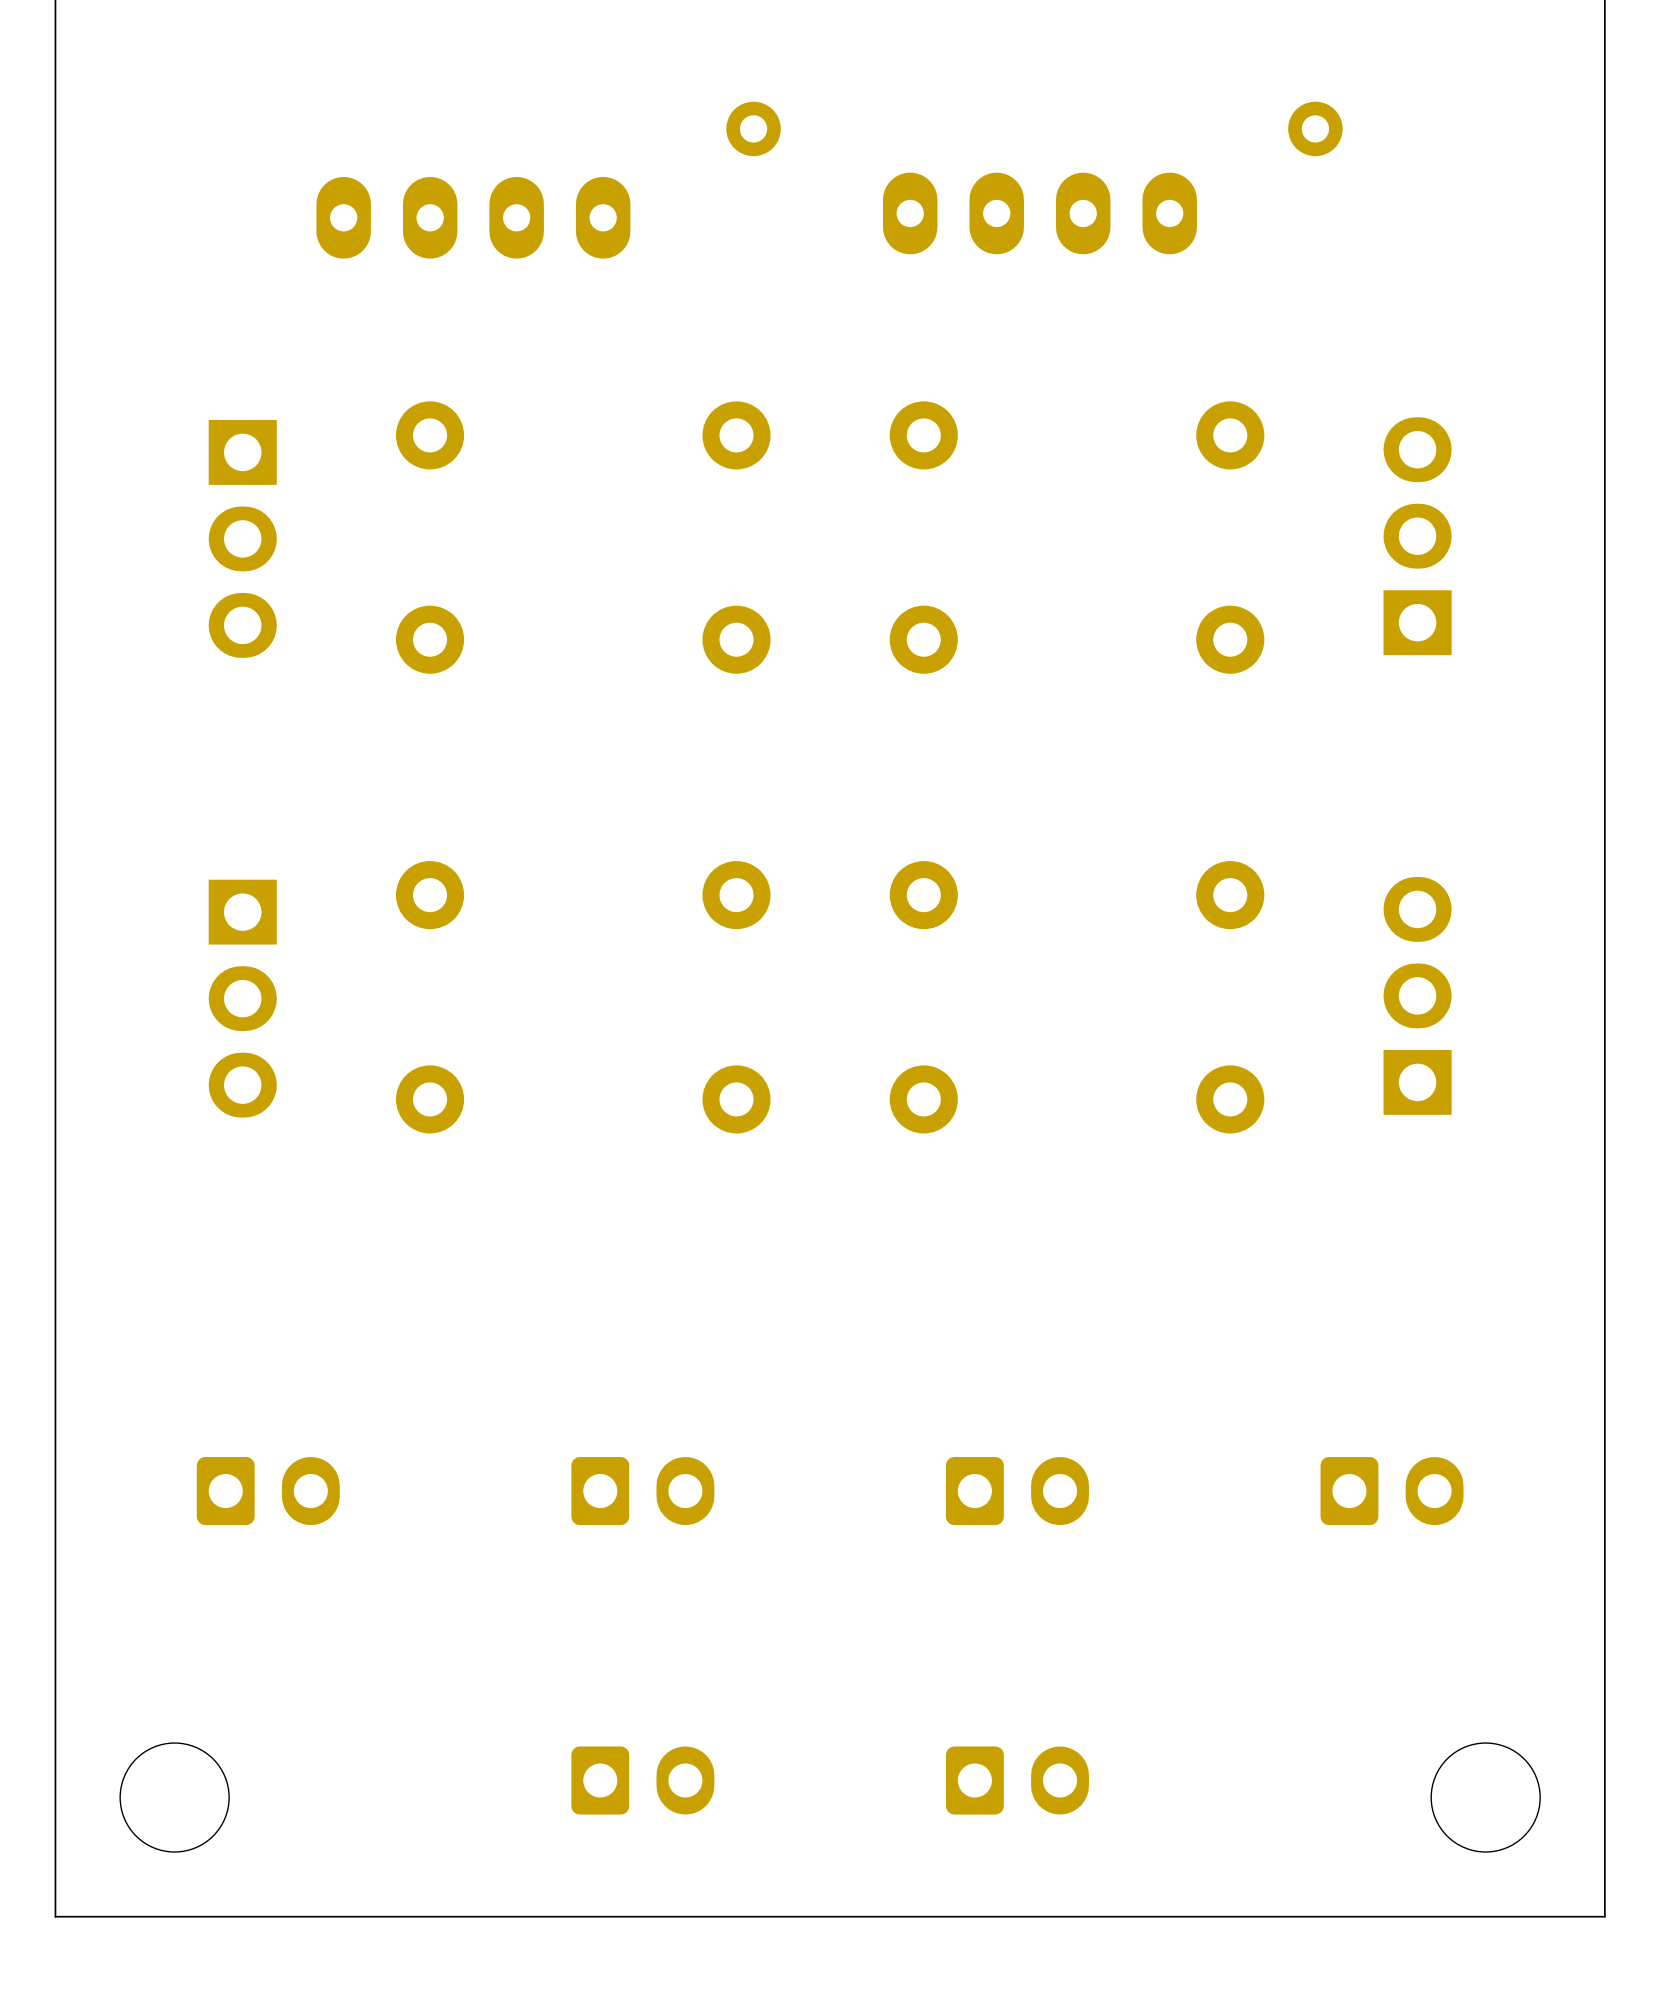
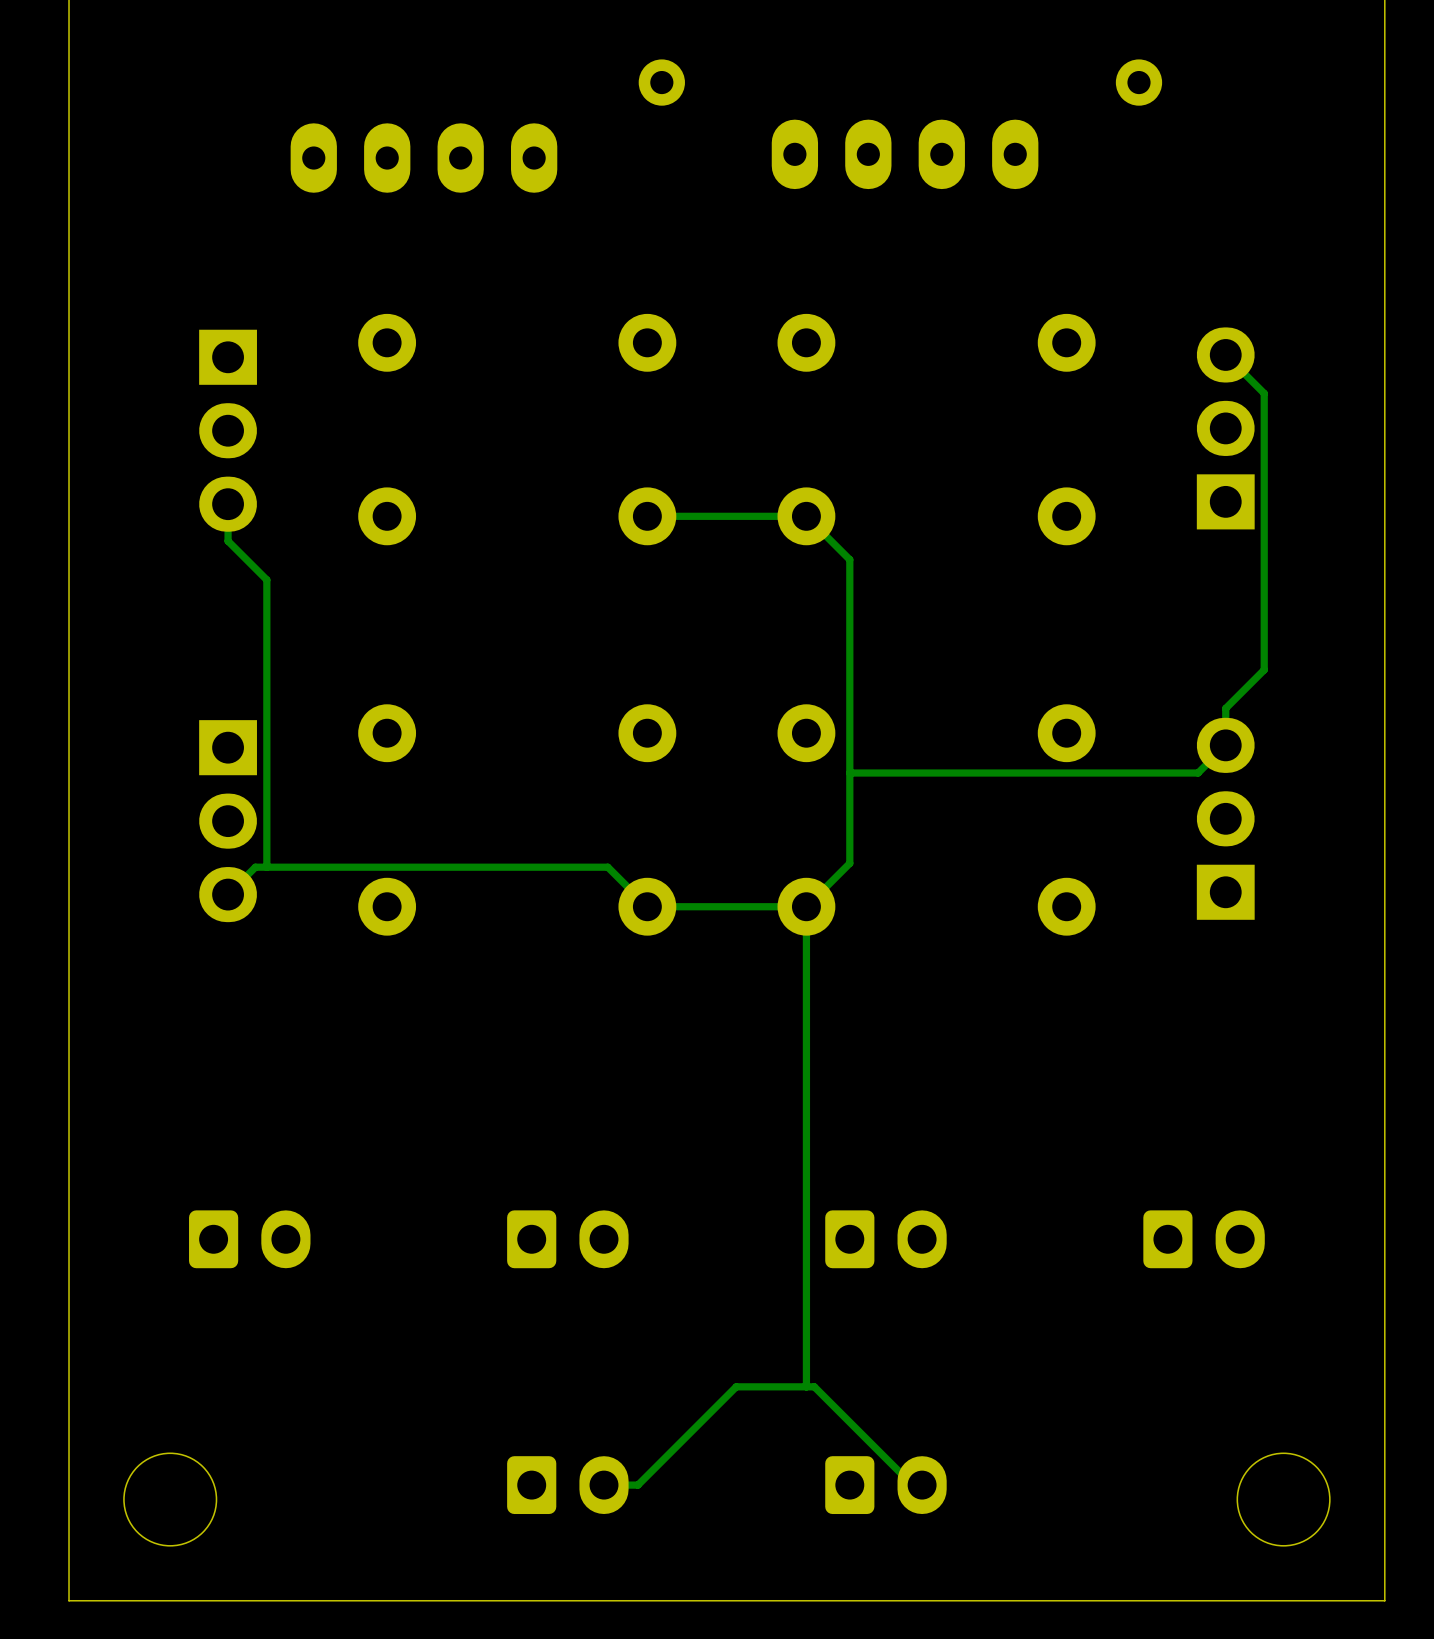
track: none -> (1225, 354) (1264, 393) (1264, 669) (1225, 708) (1225, 745) (1198, 773) (849, 773)
track: none -> (228, 504) (228, 541) (266, 579) (266, 867)
track: none -> (647, 516) (806, 516) (849, 559) (849, 863) (806, 906)
track: none -> (228, 894) (255, 867) (607, 867) (647, 906) (806, 906)
track: none -> (806, 906) (806, 1386)
track: none -> (922, 1485) (912, 1485) (814, 1386) (736, 1386) (637, 1485) (604, 1485)

